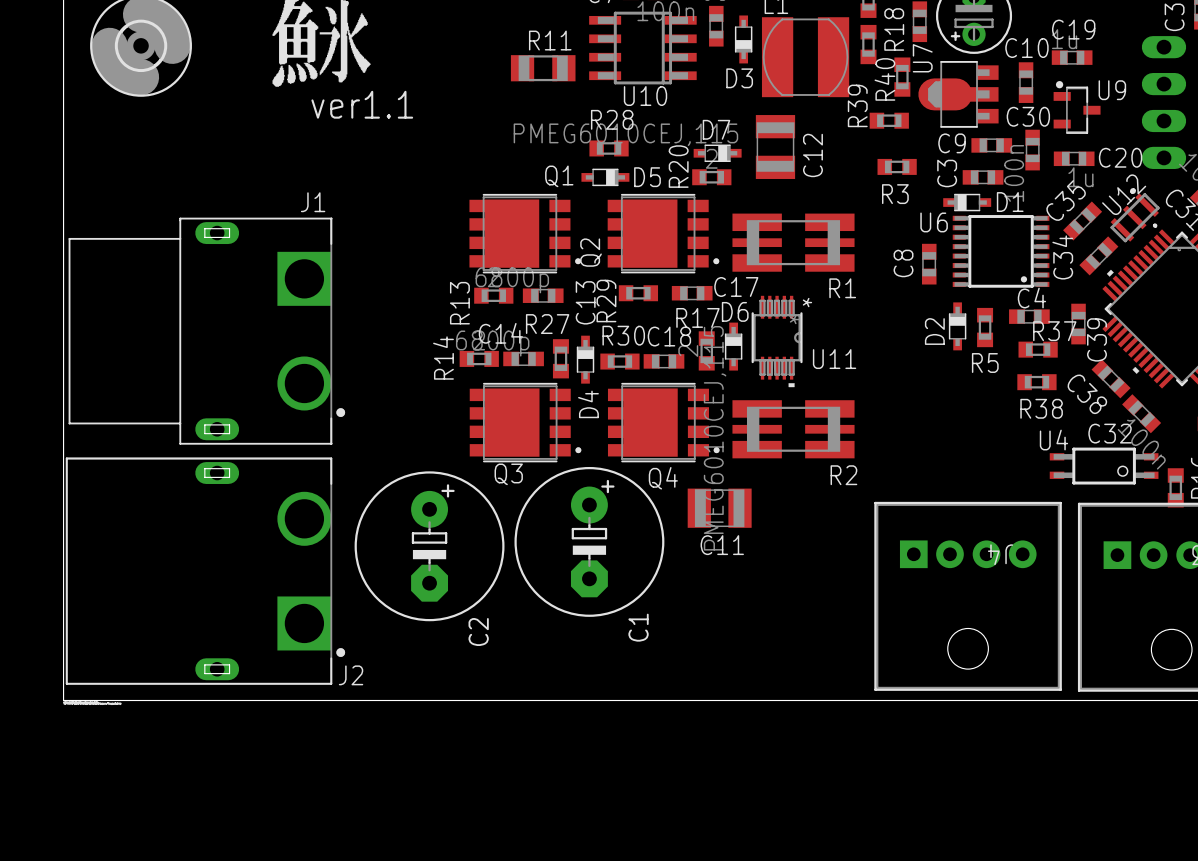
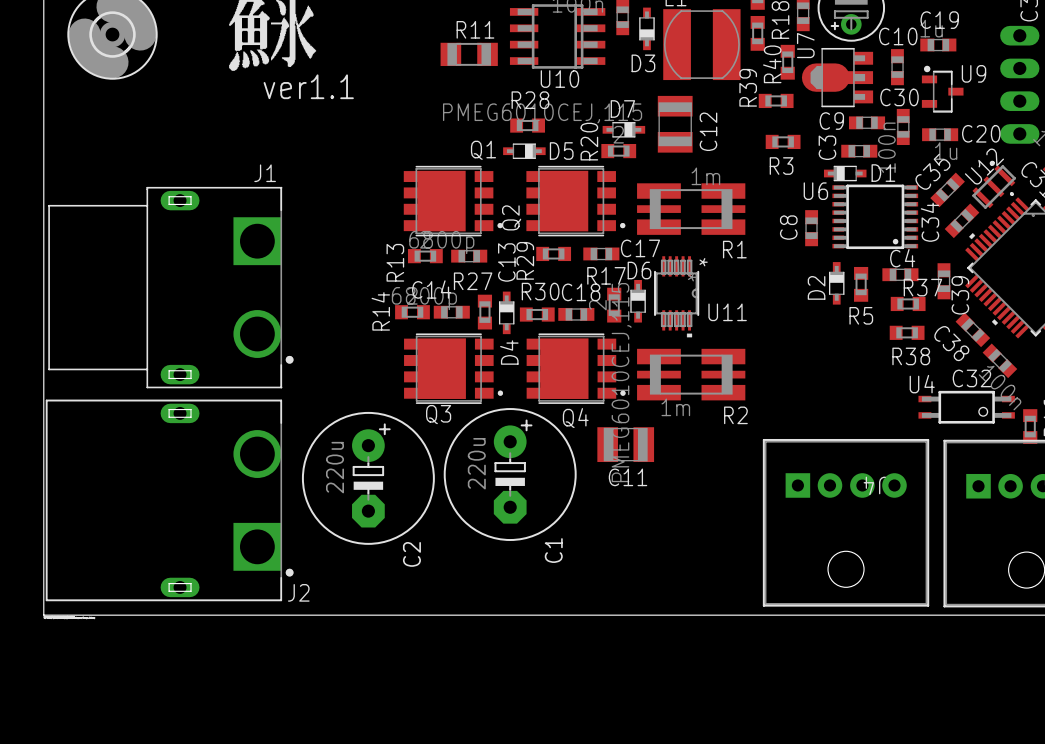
R1 value: none -> 1m (705, 176)
R2 value: none -> 1m (675, 407)
C1 value: none -> 220u (476, 463)
C2 value: none -> 220u (335, 467)

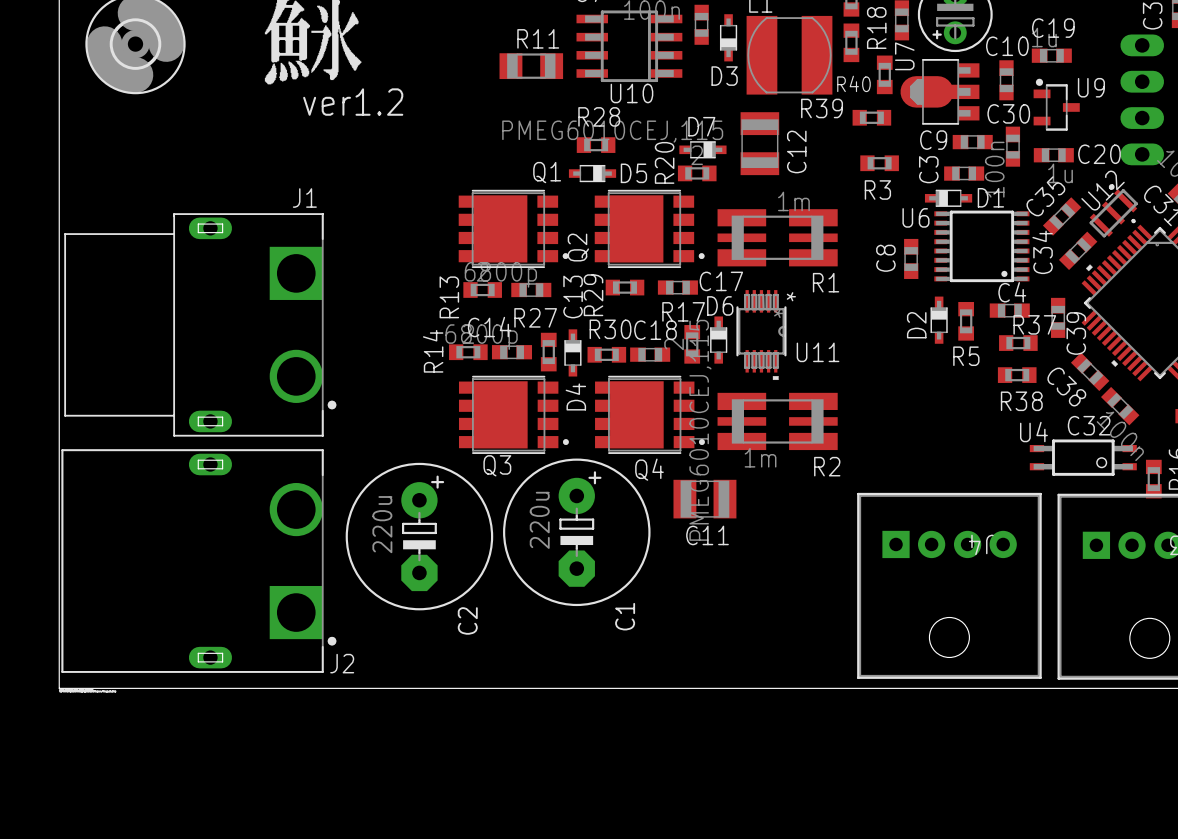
R40 name: R40 (772, 64) -> R39 (822, 108)
text: ver1.1 (308, 86) -> ver1.2 (353, 102)
R39 name: R39 (748, 87) -> R40 (853, 83)

